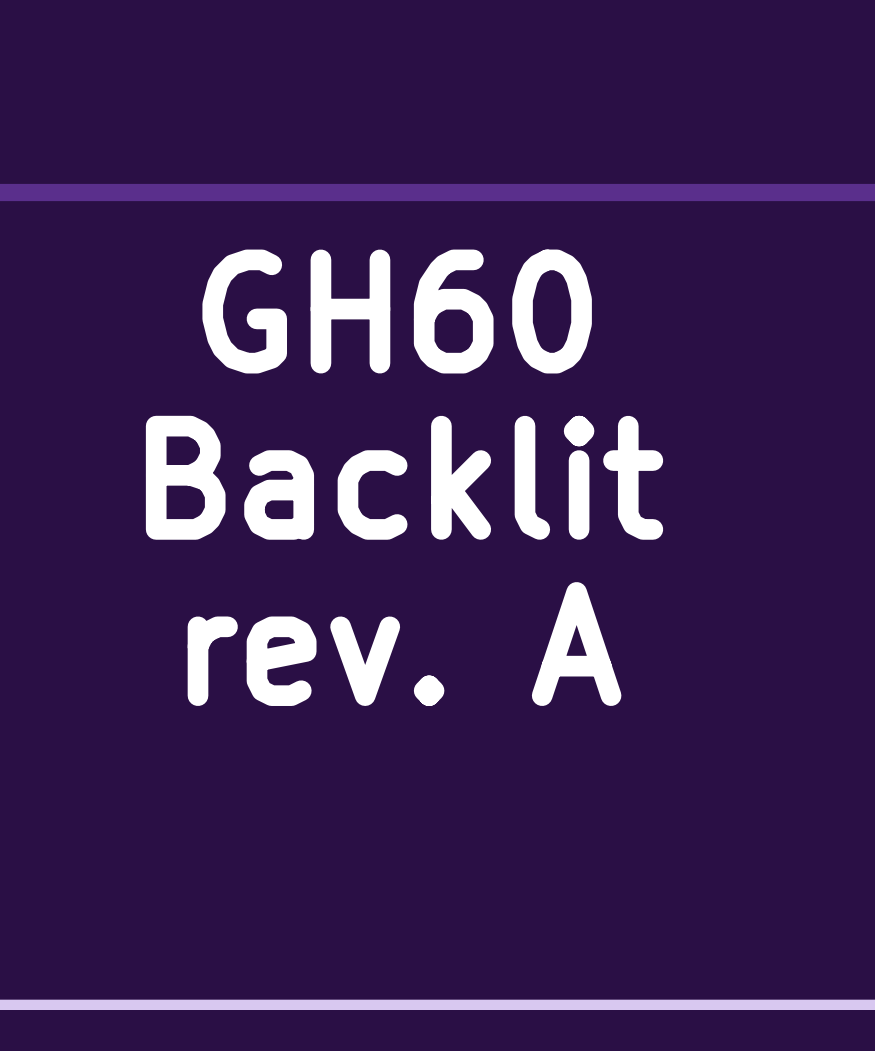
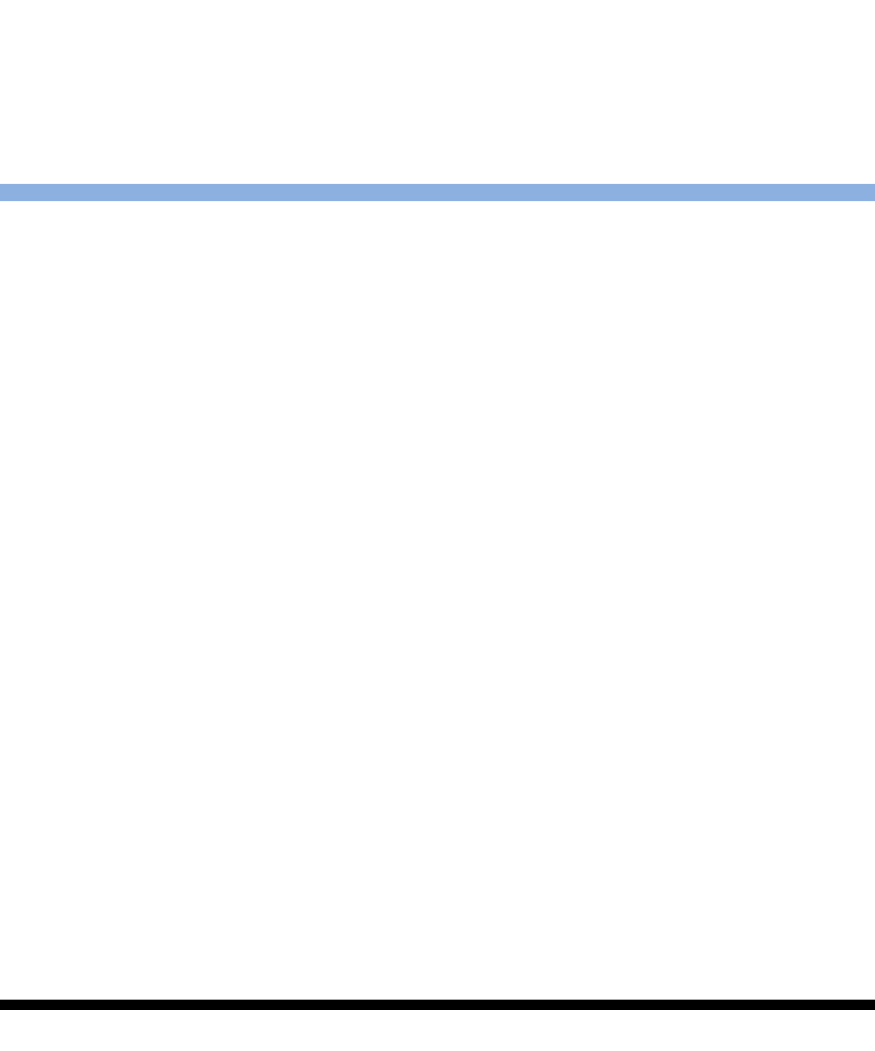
text: GH60 (397, 311) -> none
text: Backlit (404, 477) -> none
text: rev. A (404, 644) -> none

